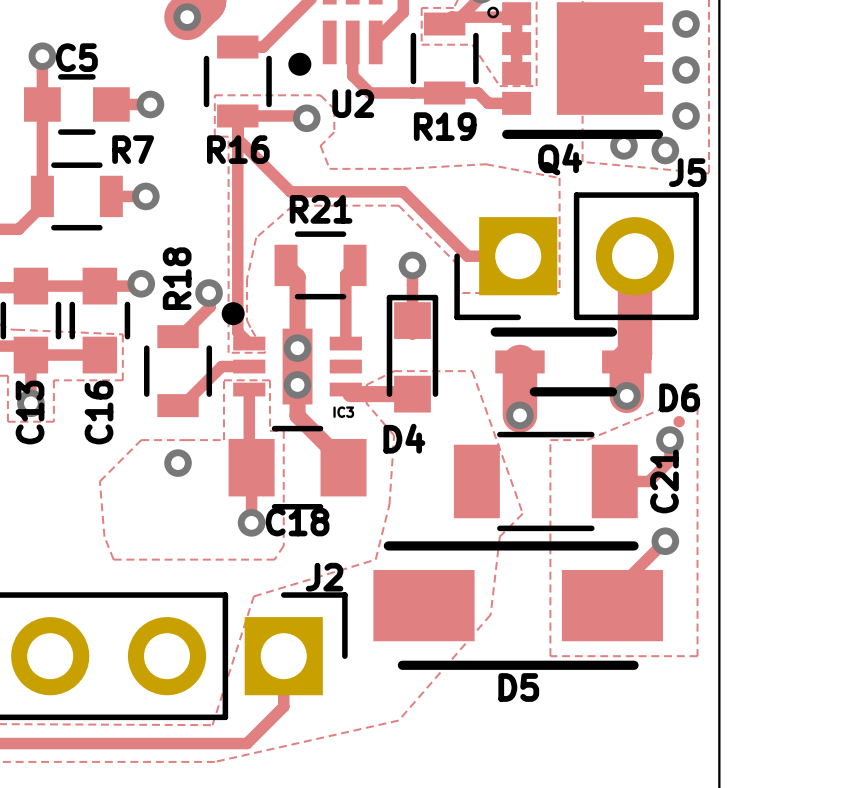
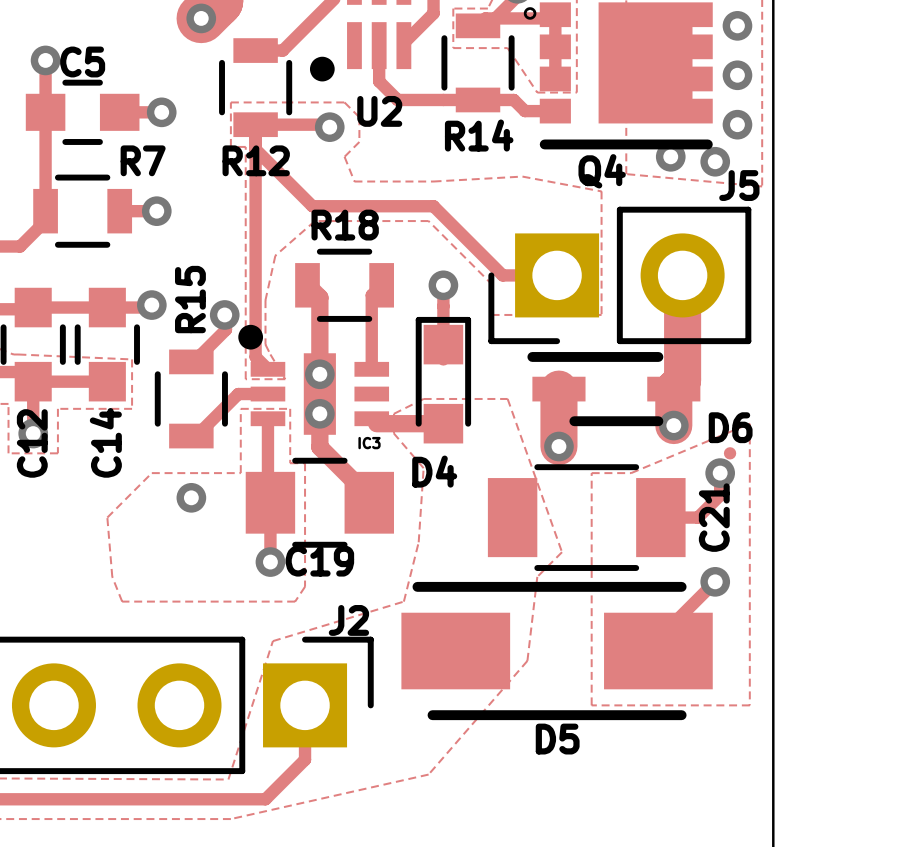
R19 name: R19 (445, 126) -> R14 (479, 135)
R16 name: R16 (238, 149) -> R12 (256, 160)
R21 name: R21 (321, 209) -> R18 (345, 225)
R18 name: R18 (177, 278) -> R15 (190, 299)
C13 name: C13 (30, 412) -> C12 (32, 443)
C16 name: C16 (99, 412) -> C14 (105, 442)
C18 name: C18 (297, 521) -> C19 (319, 561)

